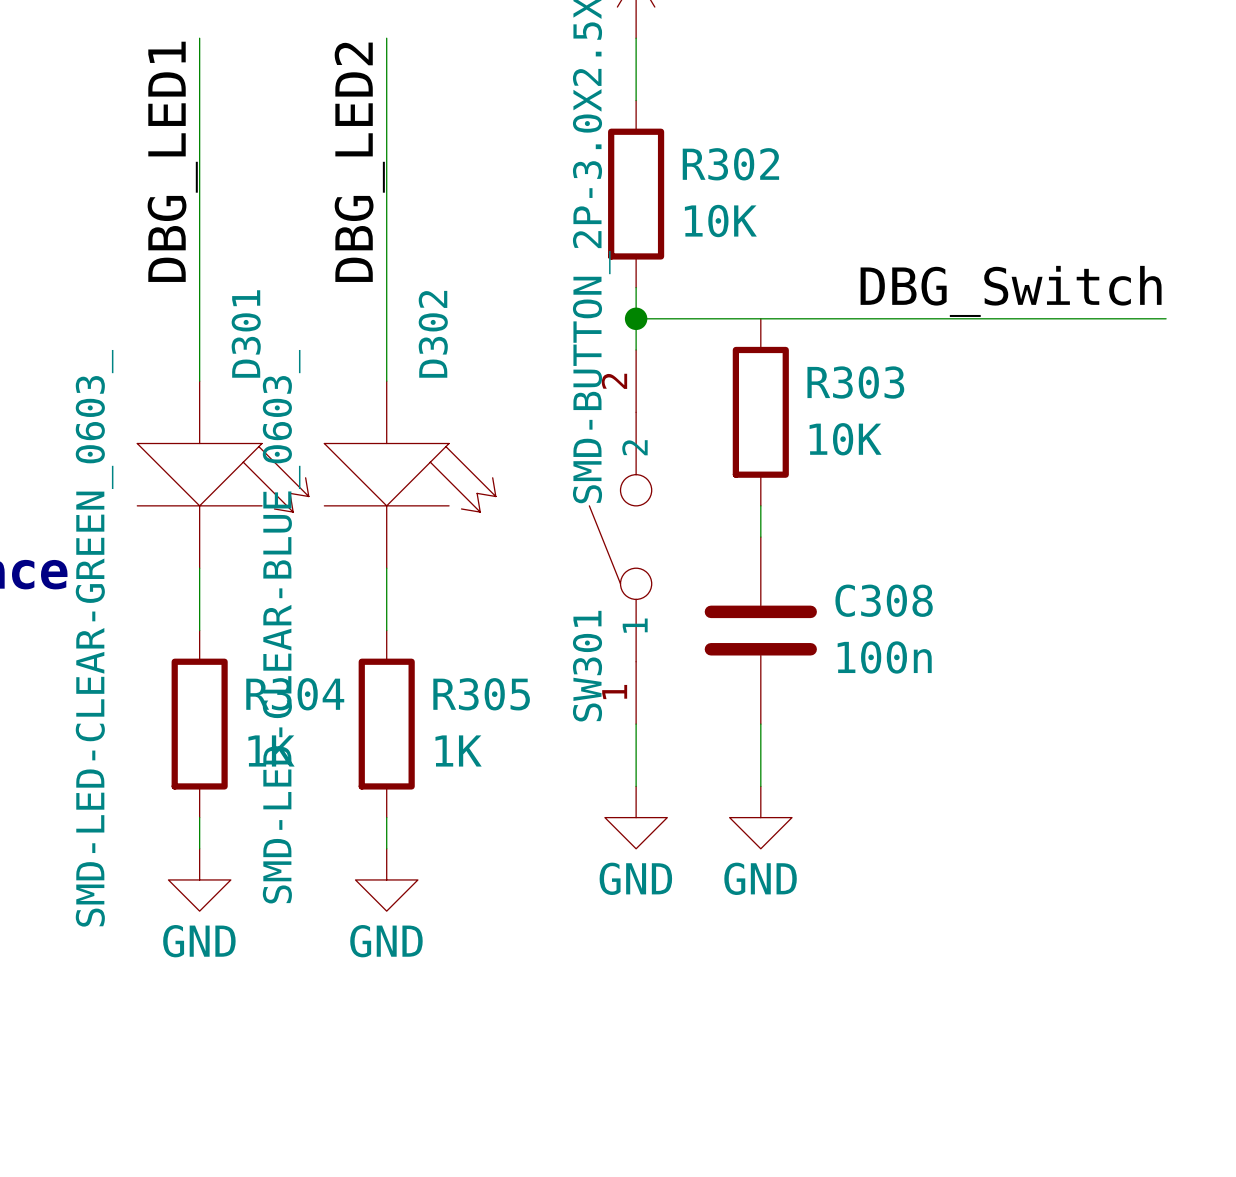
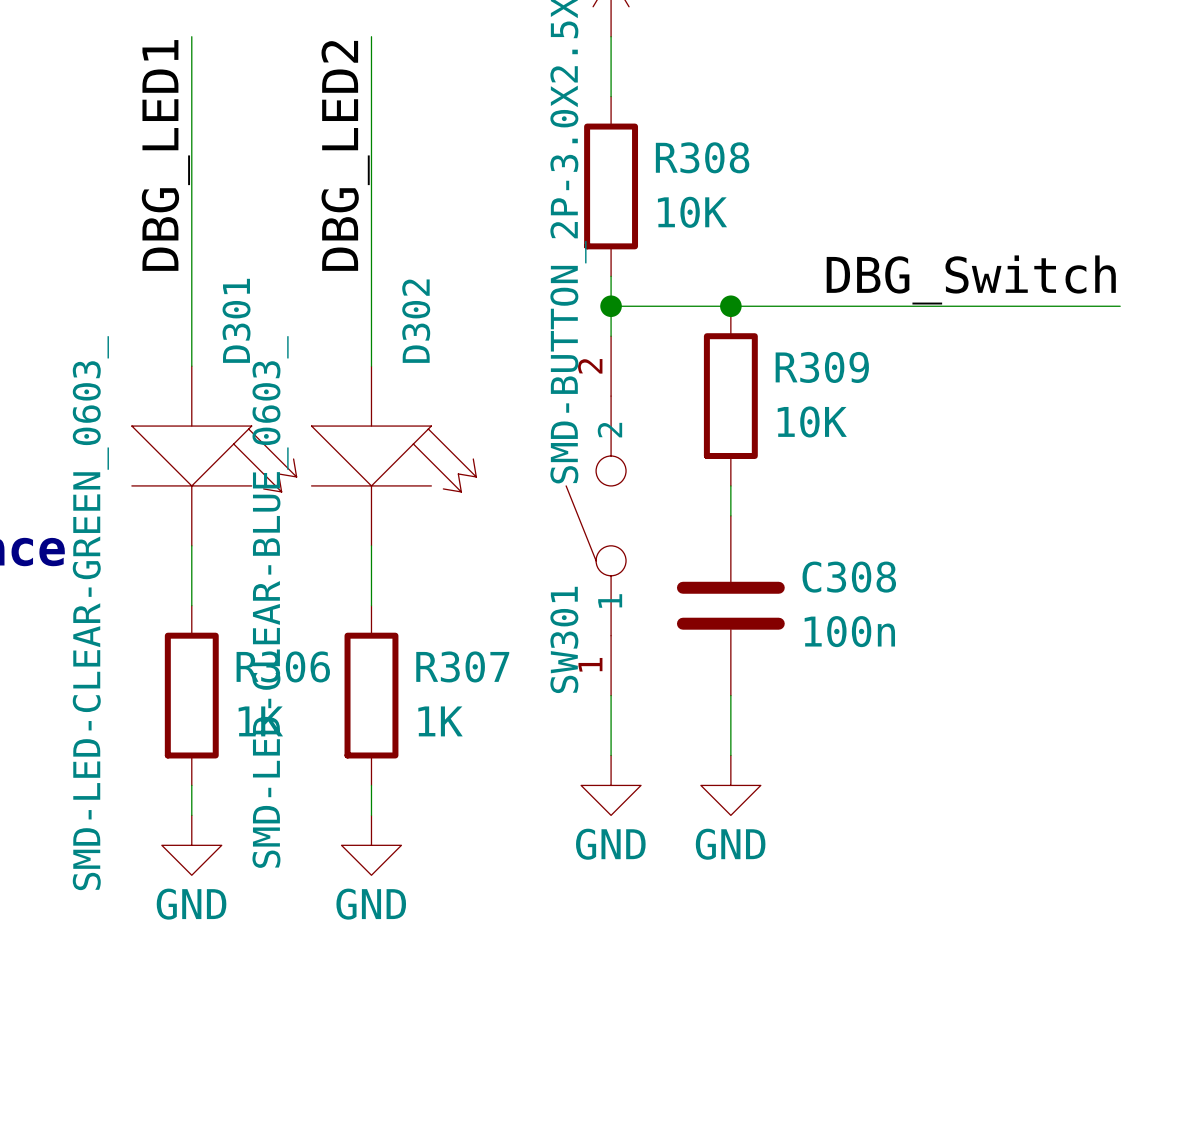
R302 name: R302 (730, 164) -> R308 (702, 157)
junction: none -> (730, 306)
R303 name: R303 (855, 382) -> R309 (822, 367)
R304 name: R304 (295, 694) -> R306 (283, 666)
R305 name: R305 (481, 694) -> R307 (462, 666)

